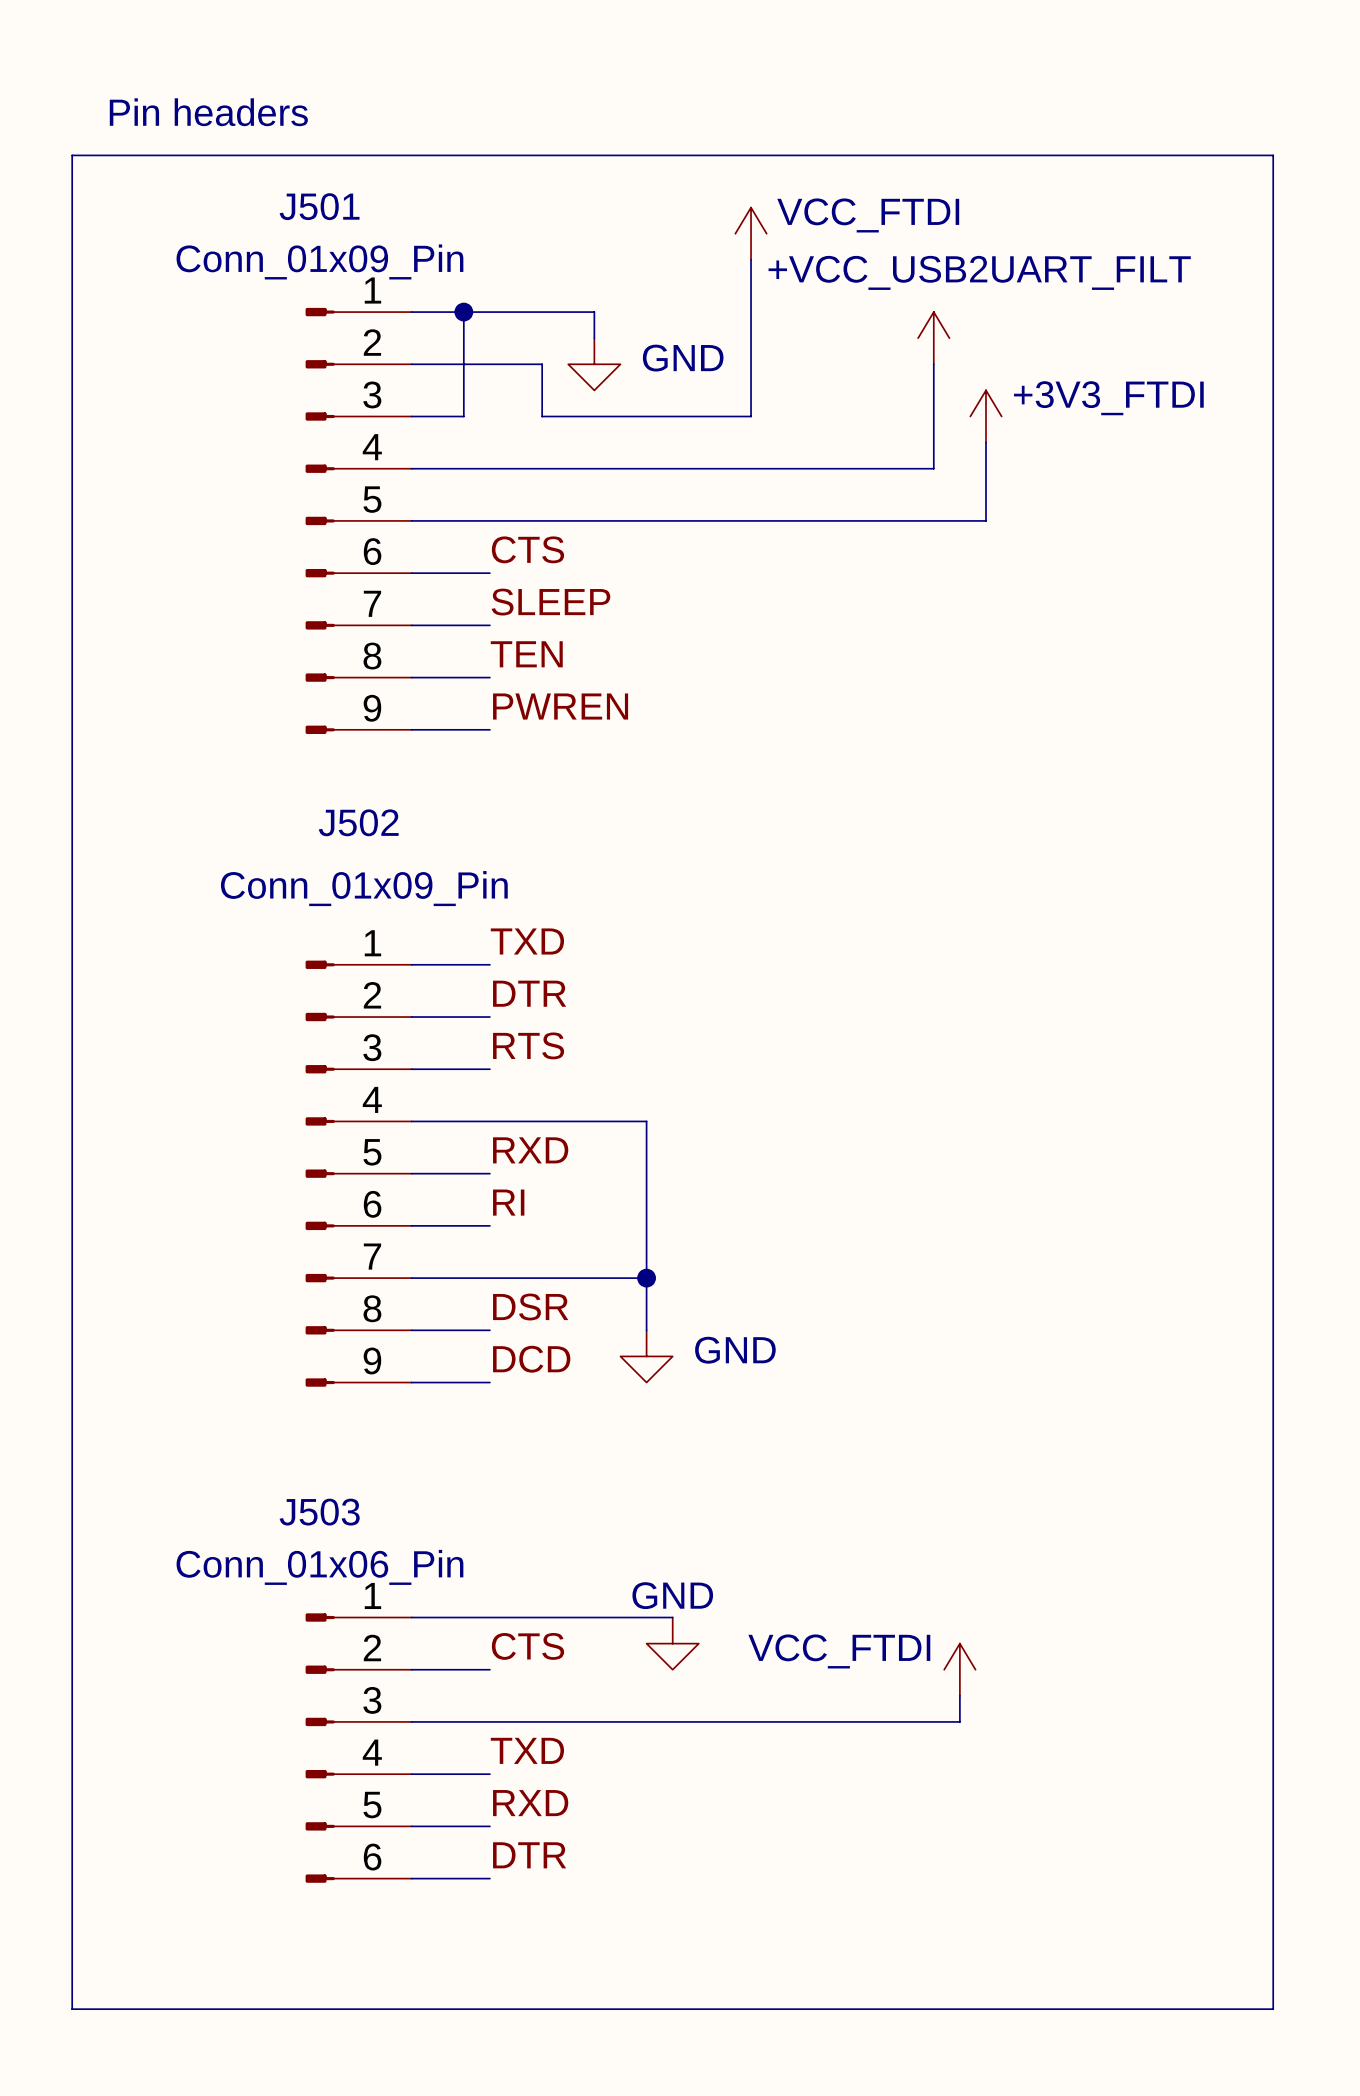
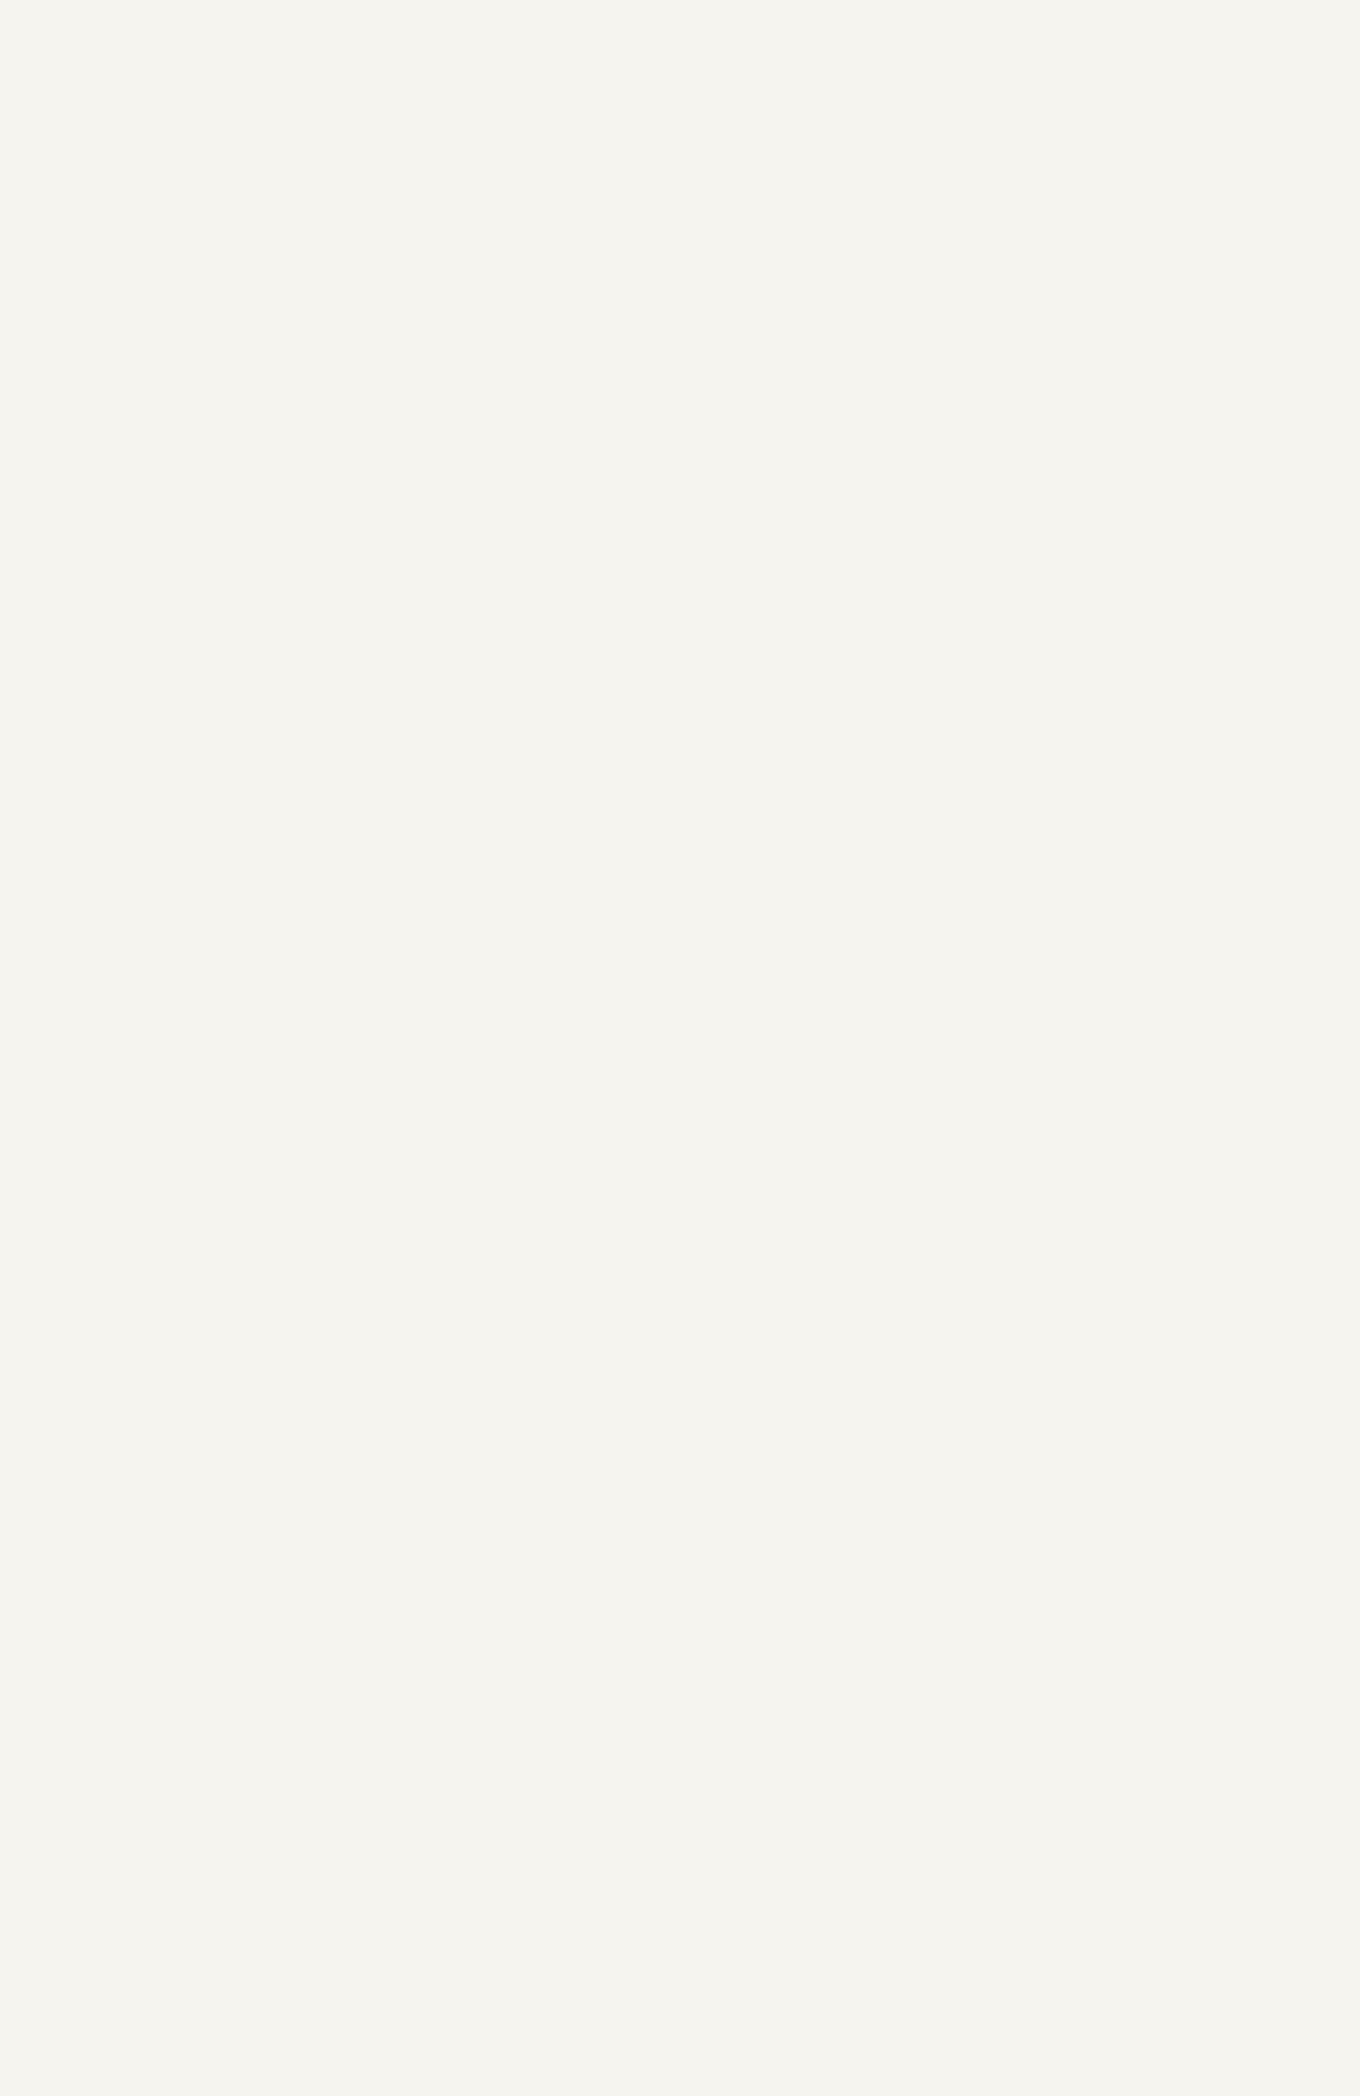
text: Pin headers (208, 112) -> none
line: (72, 155) (1273, 155) (1273, 2009) (72, 2009) (72, 155) -> none
power symbol: VCC_FTDI (751, 233) -> none
wire: (751, 259) (751, 416) (542, 416) (542, 364) (411, 364) -> none
wire: (411, 312) (594, 312) (594, 338) -> none
wire: (463, 312) (463, 416) (411, 416) -> none
junction: (463, 312) -> none
power symbol: +VCC_USB2UART_FILT (933, 338) -> none
power symbol: GND (594, 364) -> none
wire: (933, 364) (933, 468) (411, 468) -> none
power symbol: +3V3_FTDI (986, 416) -> none
wire: (986, 442) (986, 520) (411, 520) -> none
J501: Conn_01x09_Pin (358, 520) -> none
label: CTS (527, 549) -> none
wire: (411, 573) (489, 573) -> none
label: SLEEP (550, 602) -> none
wire: (411, 625) (489, 625) -> none
label: TEN (526, 654) -> none
wire: (411, 677) (489, 677) -> none
label: PWREN (560, 706) -> none
wire: (411, 729) (489, 729) -> none
label: TXD (527, 941) -> none
wire: (411, 964) (489, 964) -> none
label: DTR (529, 993) -> none
wire: (411, 1017) (489, 1017) -> none
label: RTS (528, 1045) -> none
wire: (411, 1069) (489, 1069) -> none
wire: (411, 1121) (646, 1121) (646, 1330) -> none
label: RXD (530, 1150) -> none
J502: Conn_01x09_Pin (358, 1173) -> none
wire: (411, 1173) (489, 1173) -> none
label: RI (508, 1202) -> none
wire: (411, 1225) (489, 1225) -> none
wire: (411, 1278) (646, 1278) -> none
junction: (646, 1278) -> none
label: DSR (530, 1307) -> none
wire: (411, 1330) (489, 1330) -> none
power symbol: GND (646, 1356) -> none
label: DCD (531, 1359) -> none
wire: (411, 1382) (489, 1382) -> none
wire: (411, 1617) (672, 1617) -> none
power symbol: GND (672, 1643) -> none
label: CTS (527, 1646) -> none
wire: (411, 1669) (489, 1669) -> none
power symbol: VCC_FTDI (959, 1669) -> none
wire: (959, 1695) (959, 1721) (411, 1721) -> none
J503: Conn_01x06_Pin (358, 1748) -> none
label: TXD (527, 1750) -> none
wire: (411, 1774) (489, 1774) -> none
label: RXD (530, 1803) -> none
wire: (411, 1826) (489, 1826) -> none
label: DTR (529, 1855) -> none
wire: (411, 1878) (489, 1878) -> none

